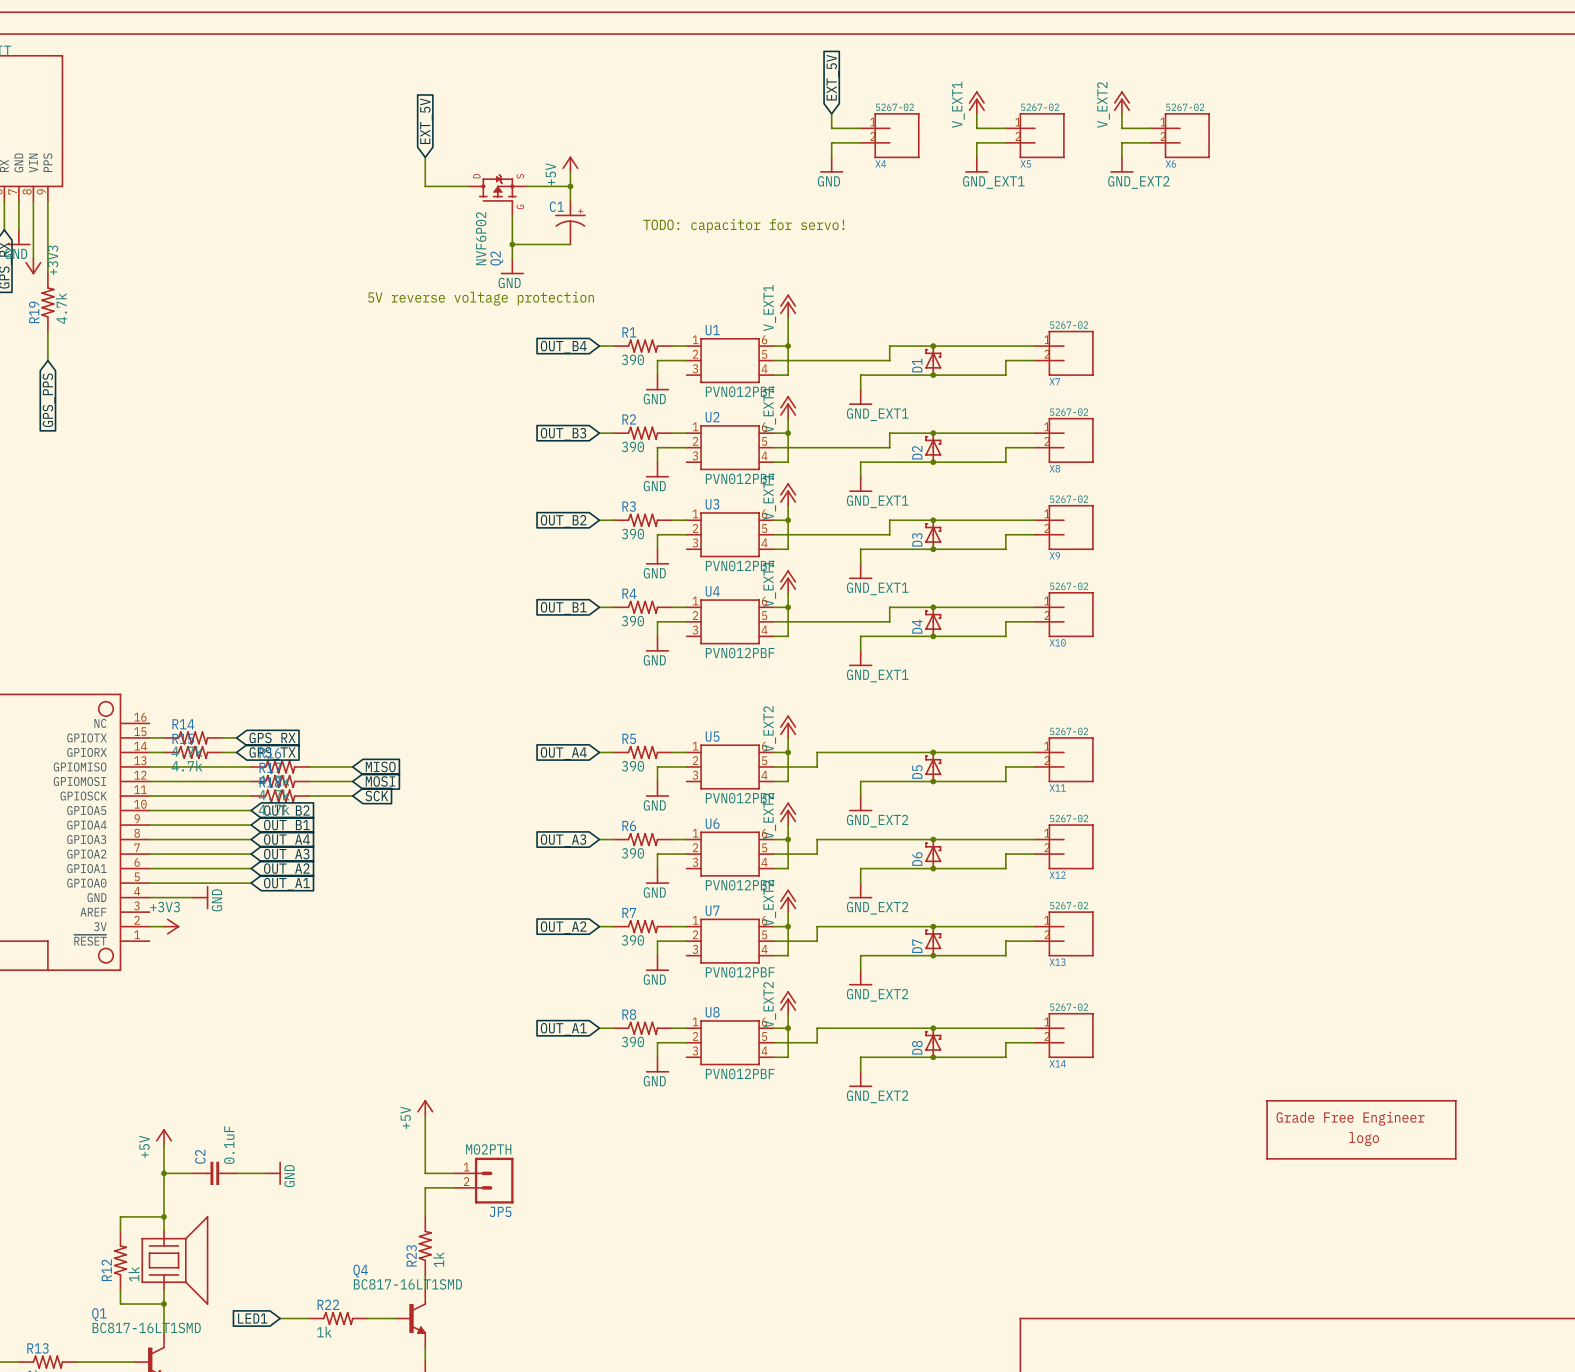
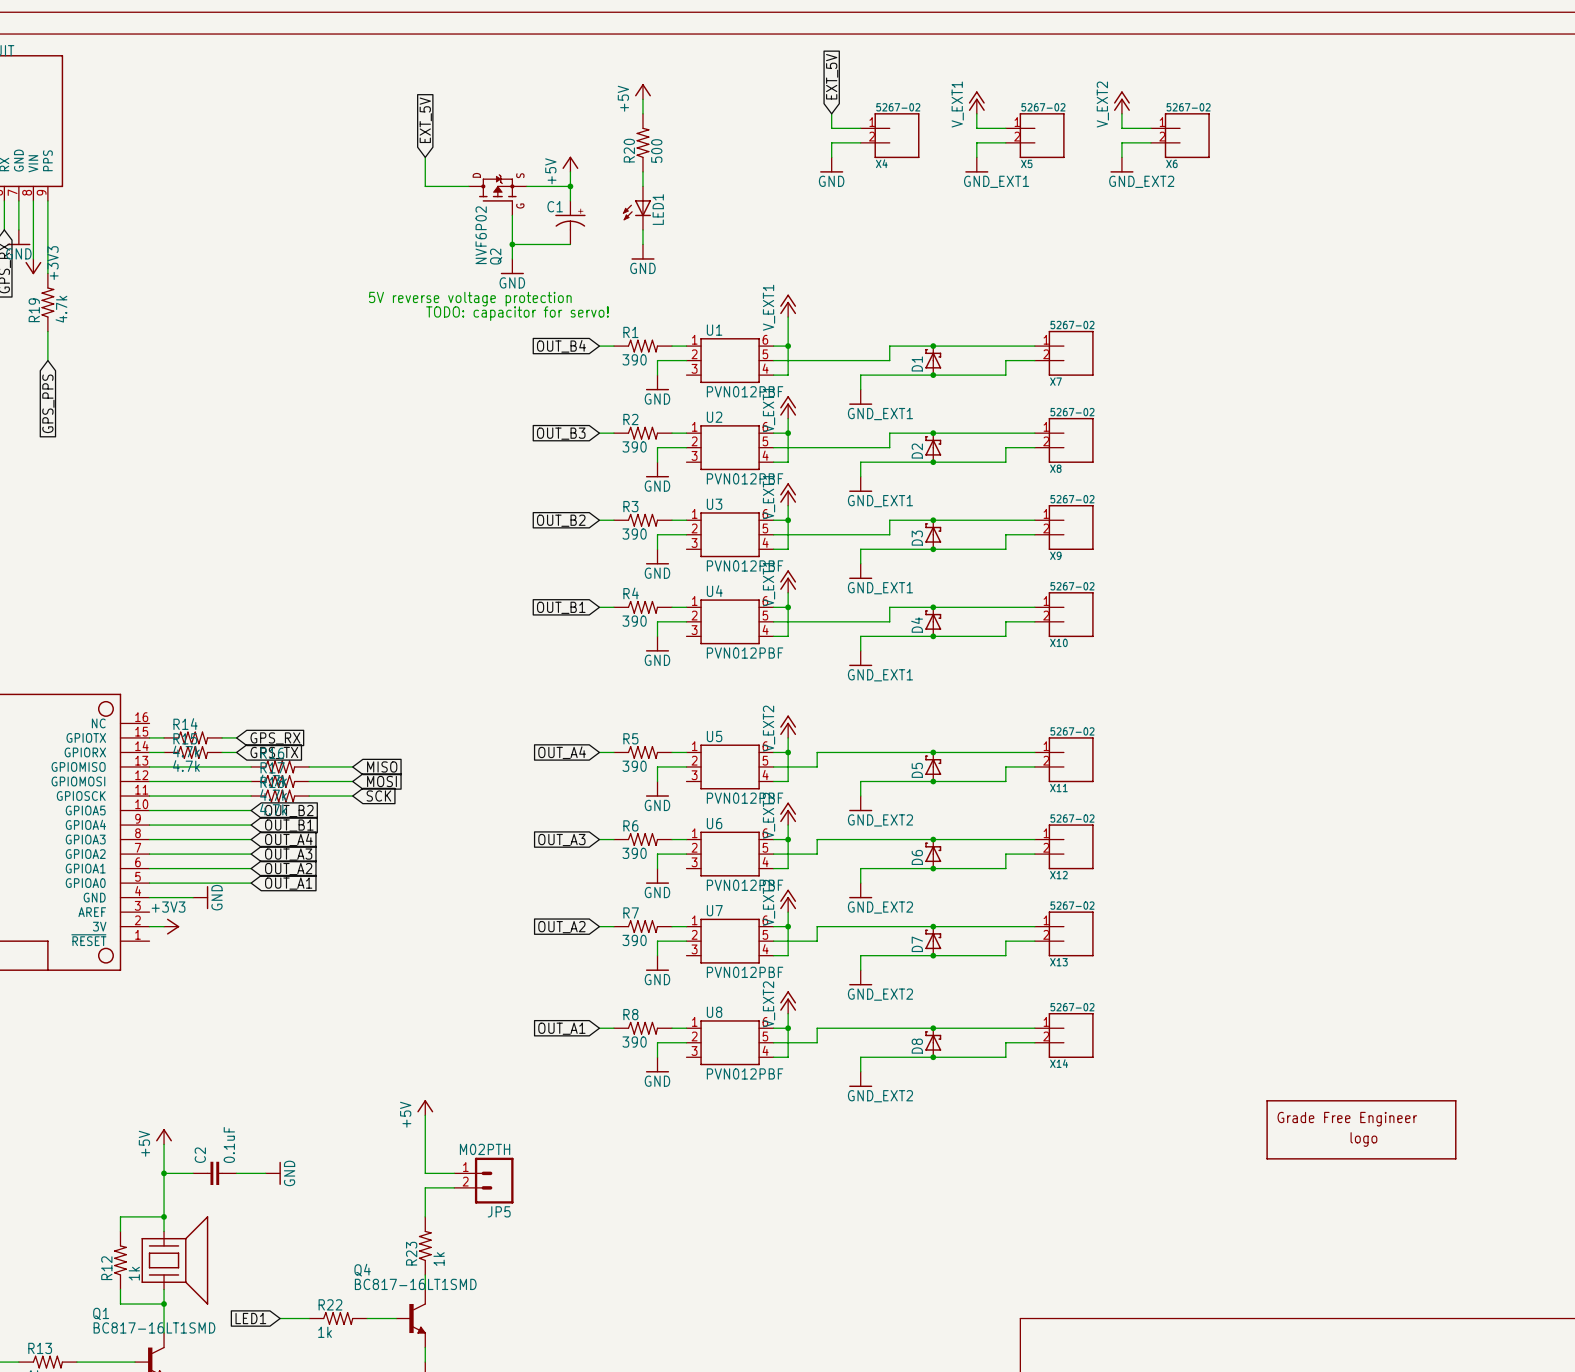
power symbol: none -> +5V (642, 91)
wire: none -> (642, 99) (642, 113)
R20: none -> 500 (642, 142)
wire: none -> (642, 171) (642, 186)
LED1: none -> (636, 208)
text: TODO: capacitor for servo! (743, 225) -> none
wire: none -> (642, 229) (642, 244)
power symbol: none -> GND (642, 252)
text: none -> TODO: capacitor for servo! (517, 313)

